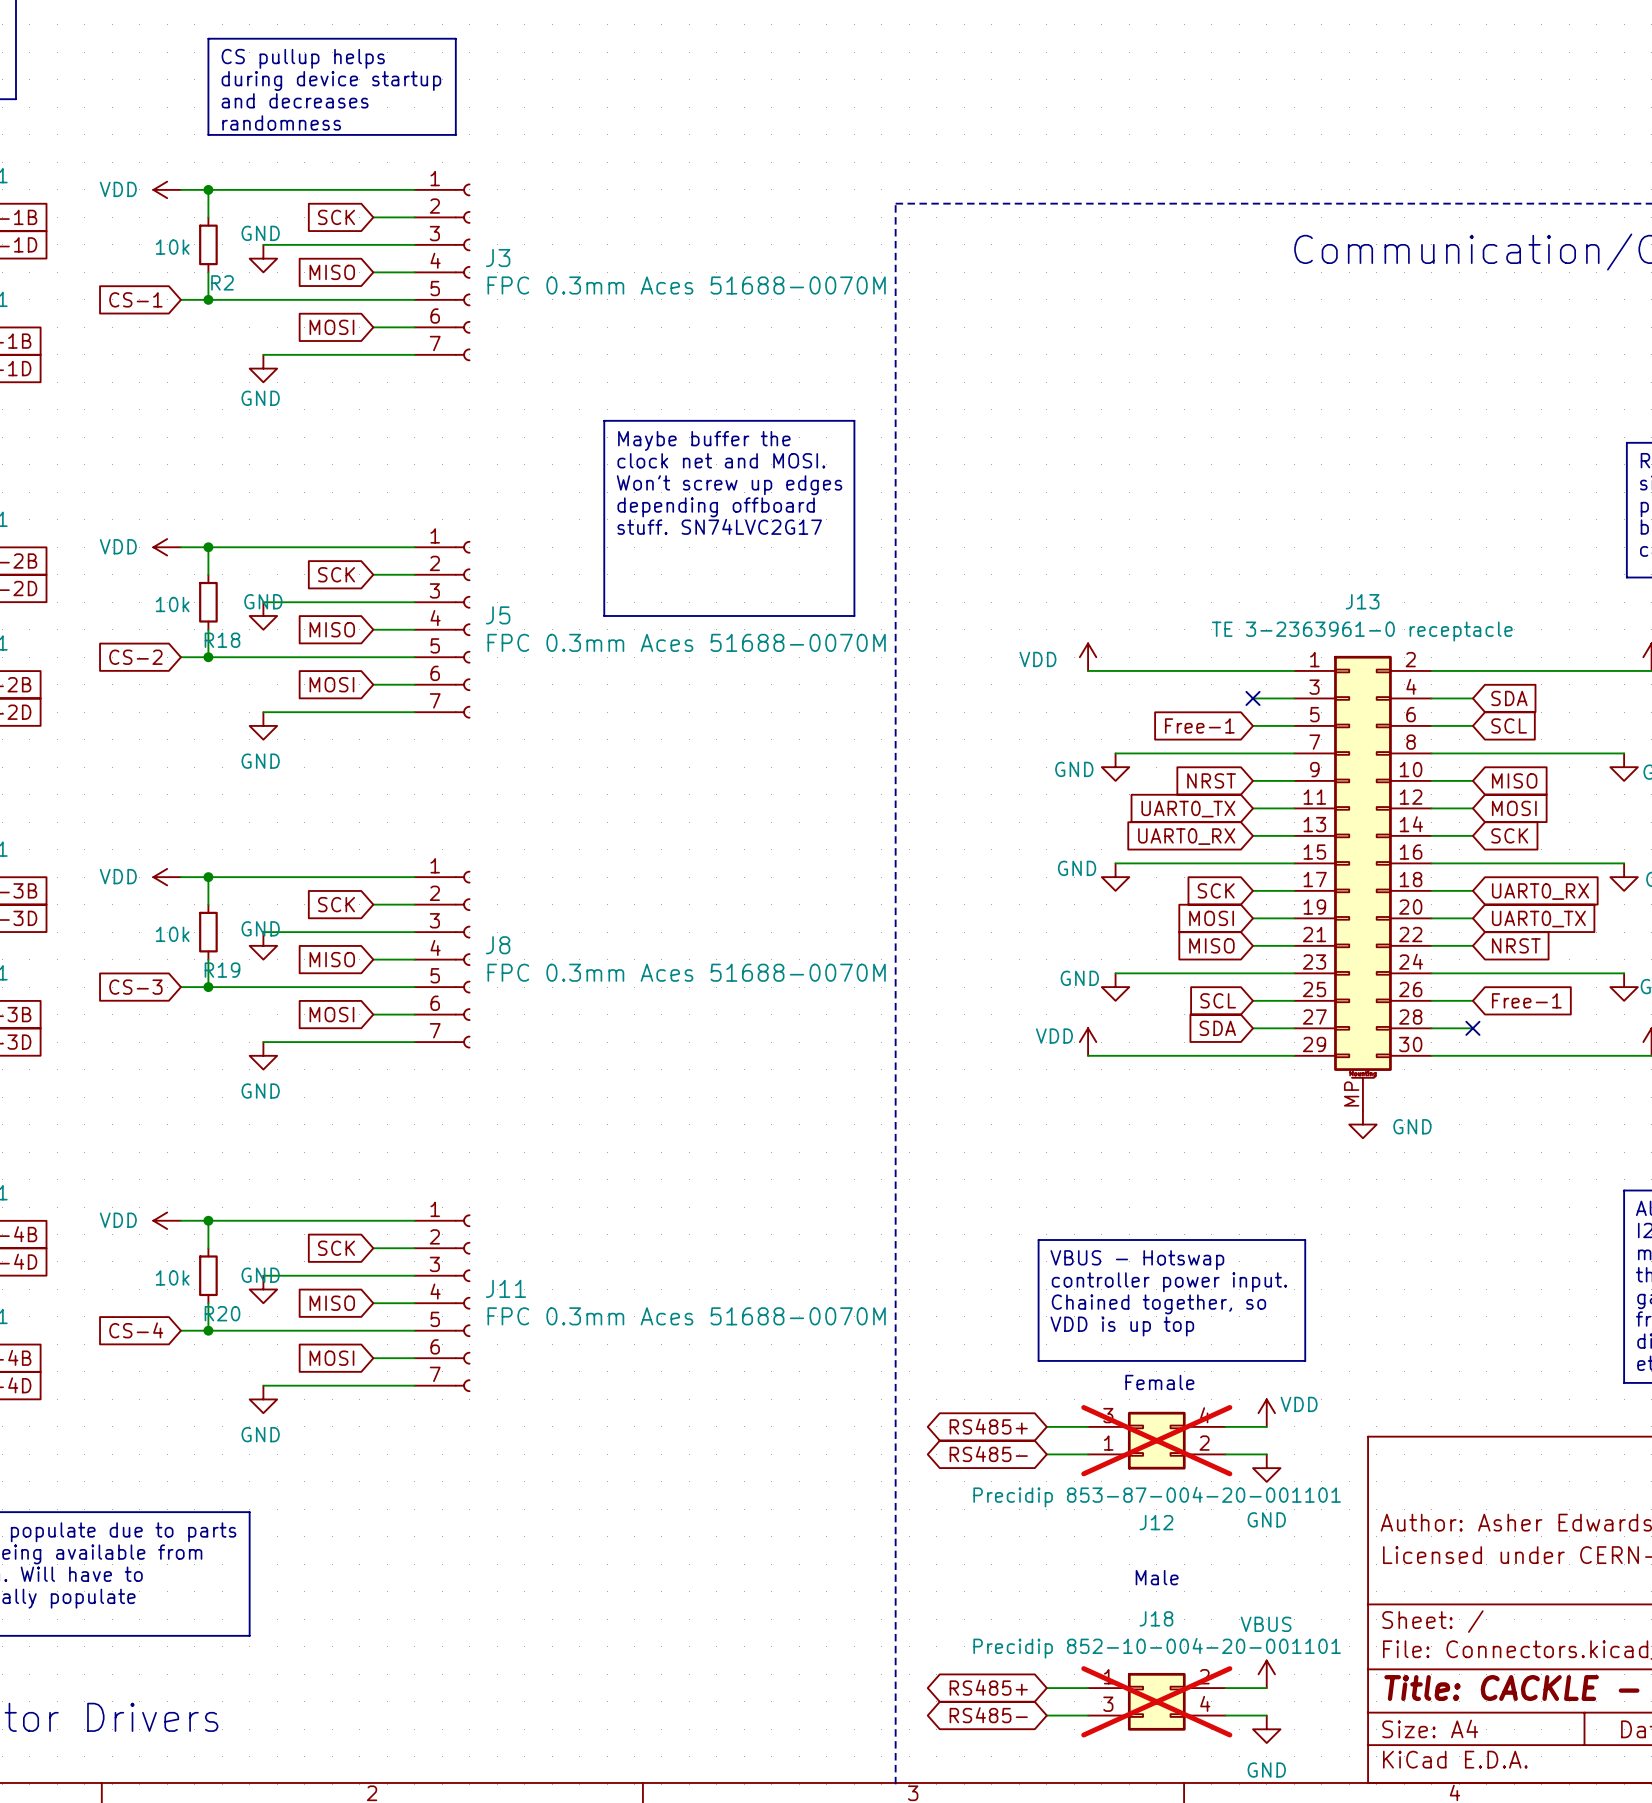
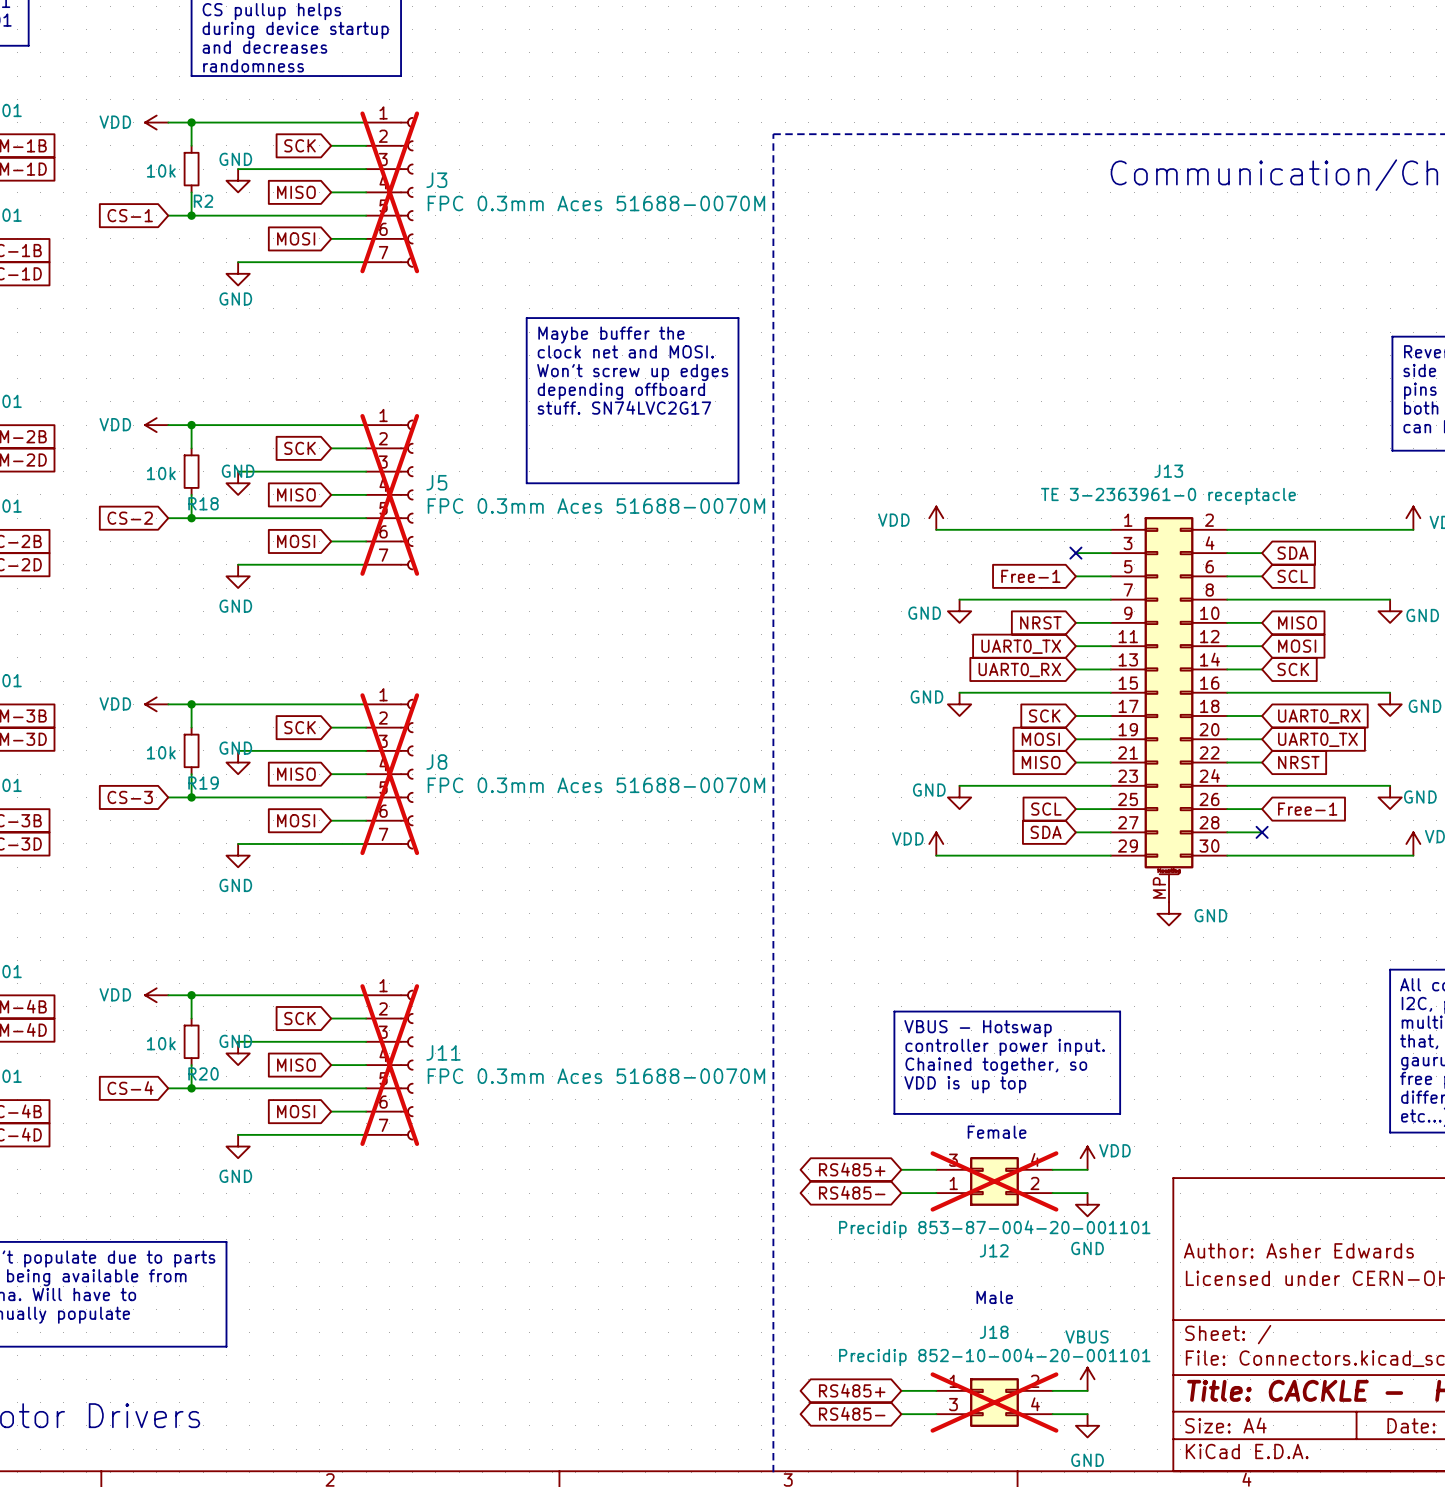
J3 do-not-place cross: none -> (389, 192)
J5 do-not-place cross: none -> (389, 494)
J8 do-not-place cross: none -> (389, 774)
J11 do-not-place cross: none -> (389, 1065)

